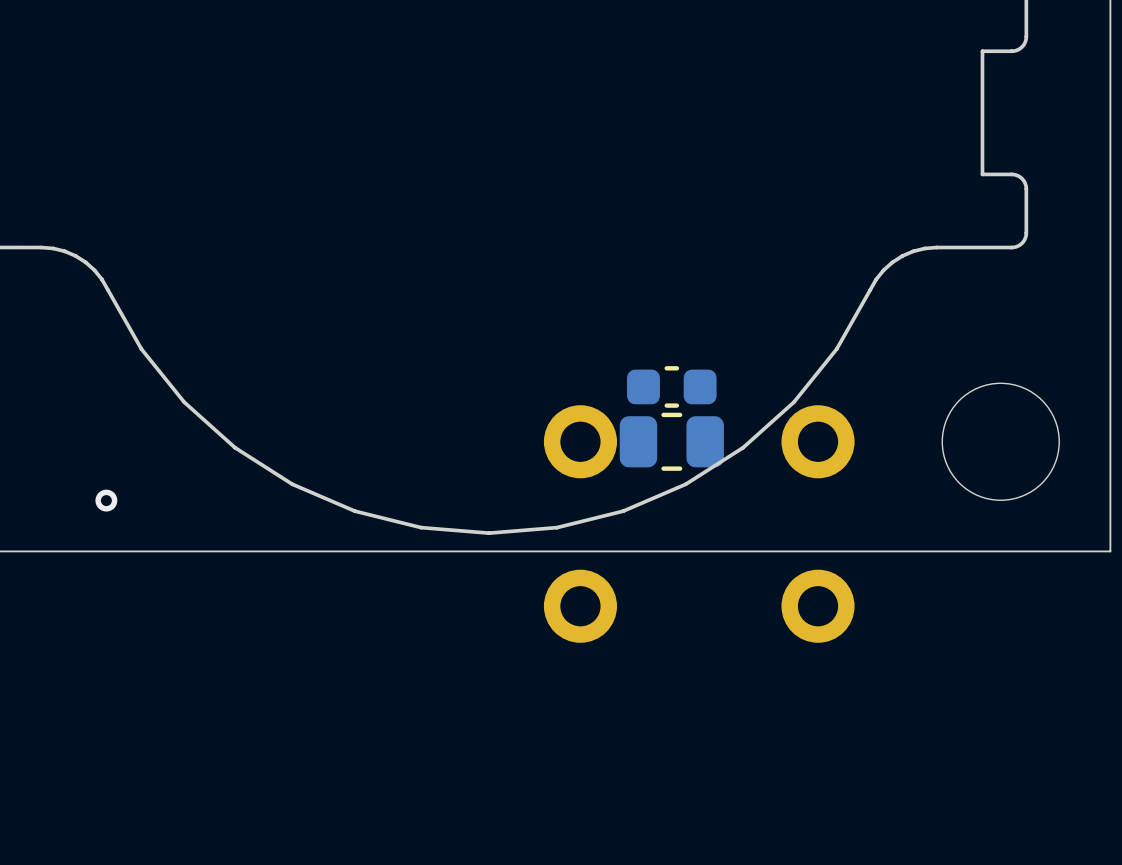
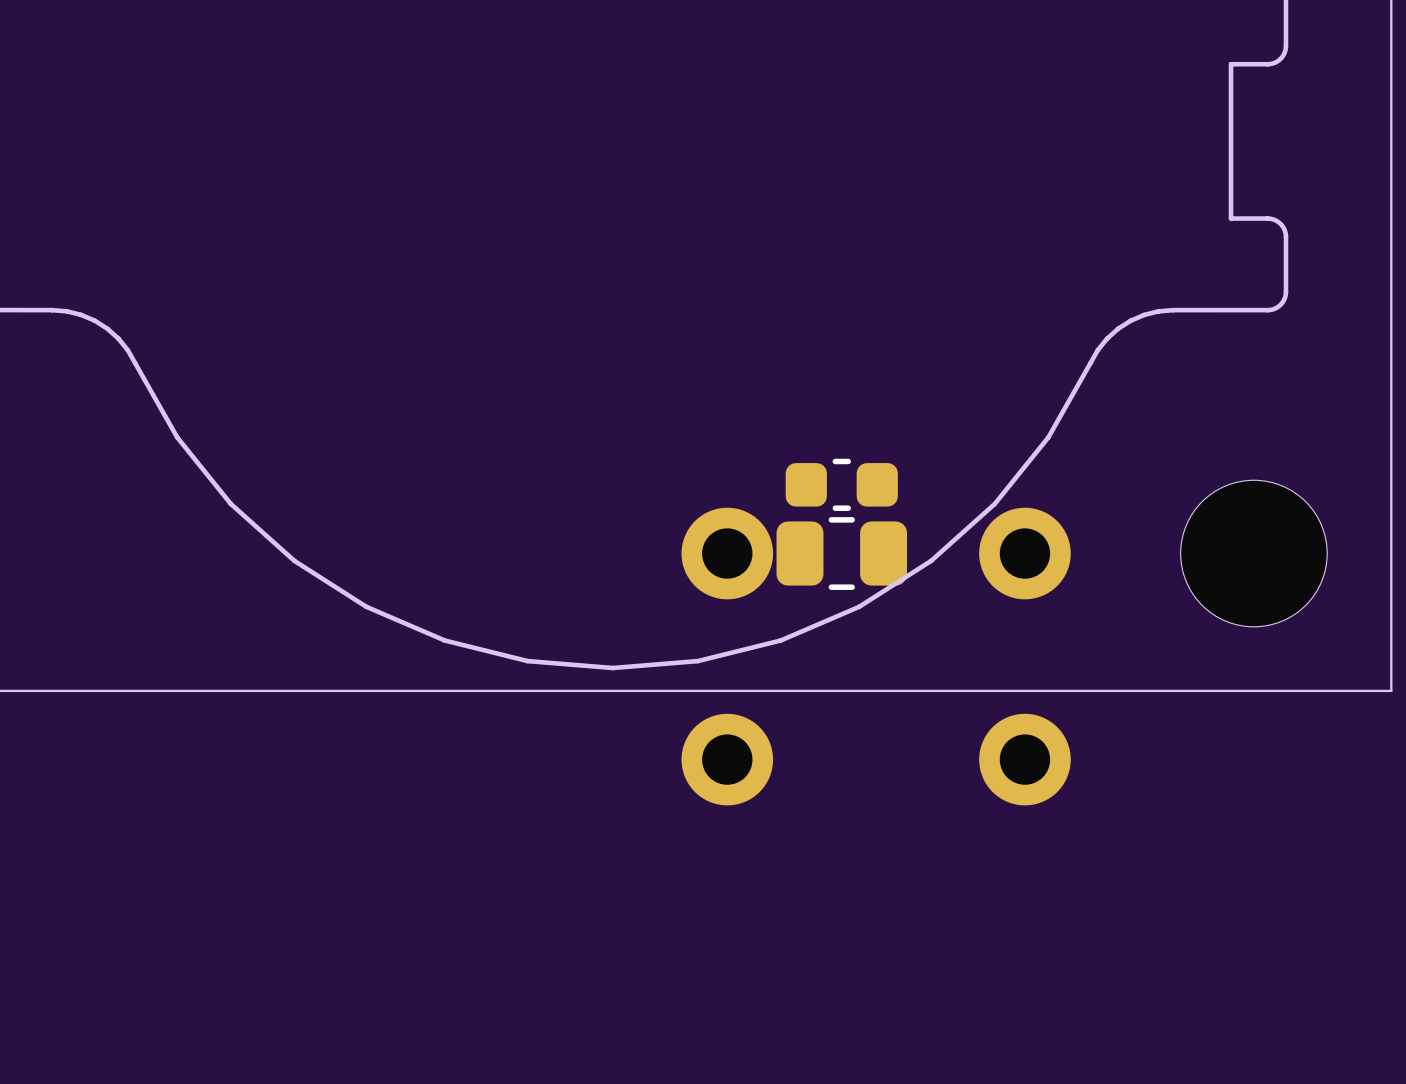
via: (106, 500) -> none

